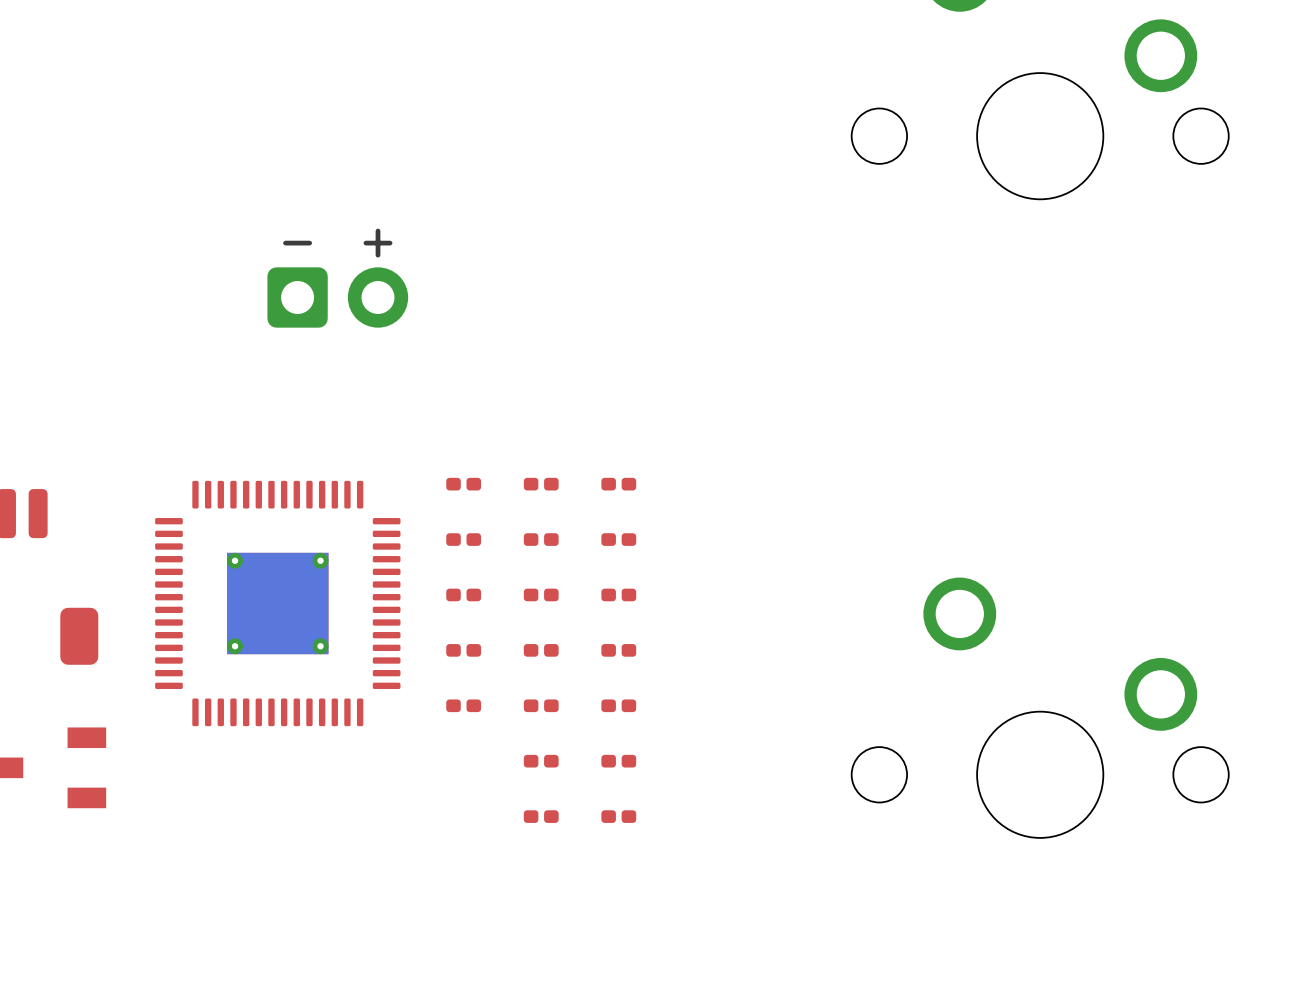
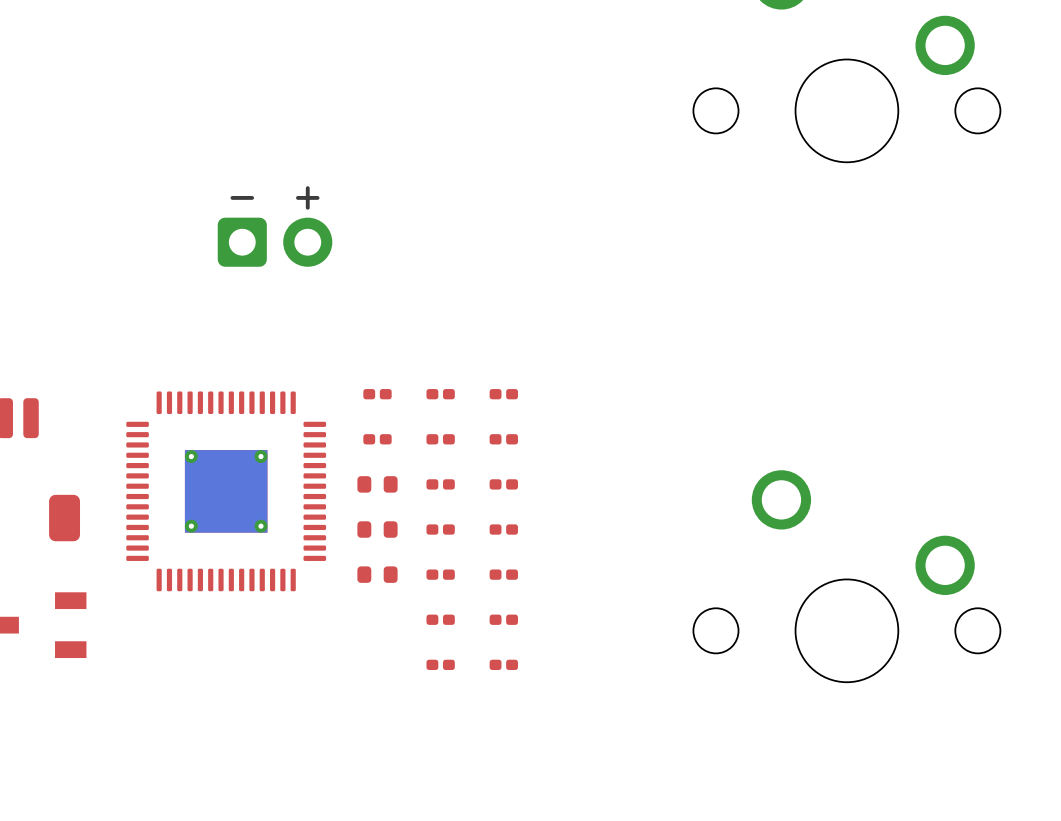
part footprint: [446, 588, 482, 602] -> [357, 476, 398, 493]
part footprint: [446, 644, 482, 657] -> [357, 521, 398, 538]
part footprint: [446, 699, 482, 713] -> [357, 566, 398, 583]

